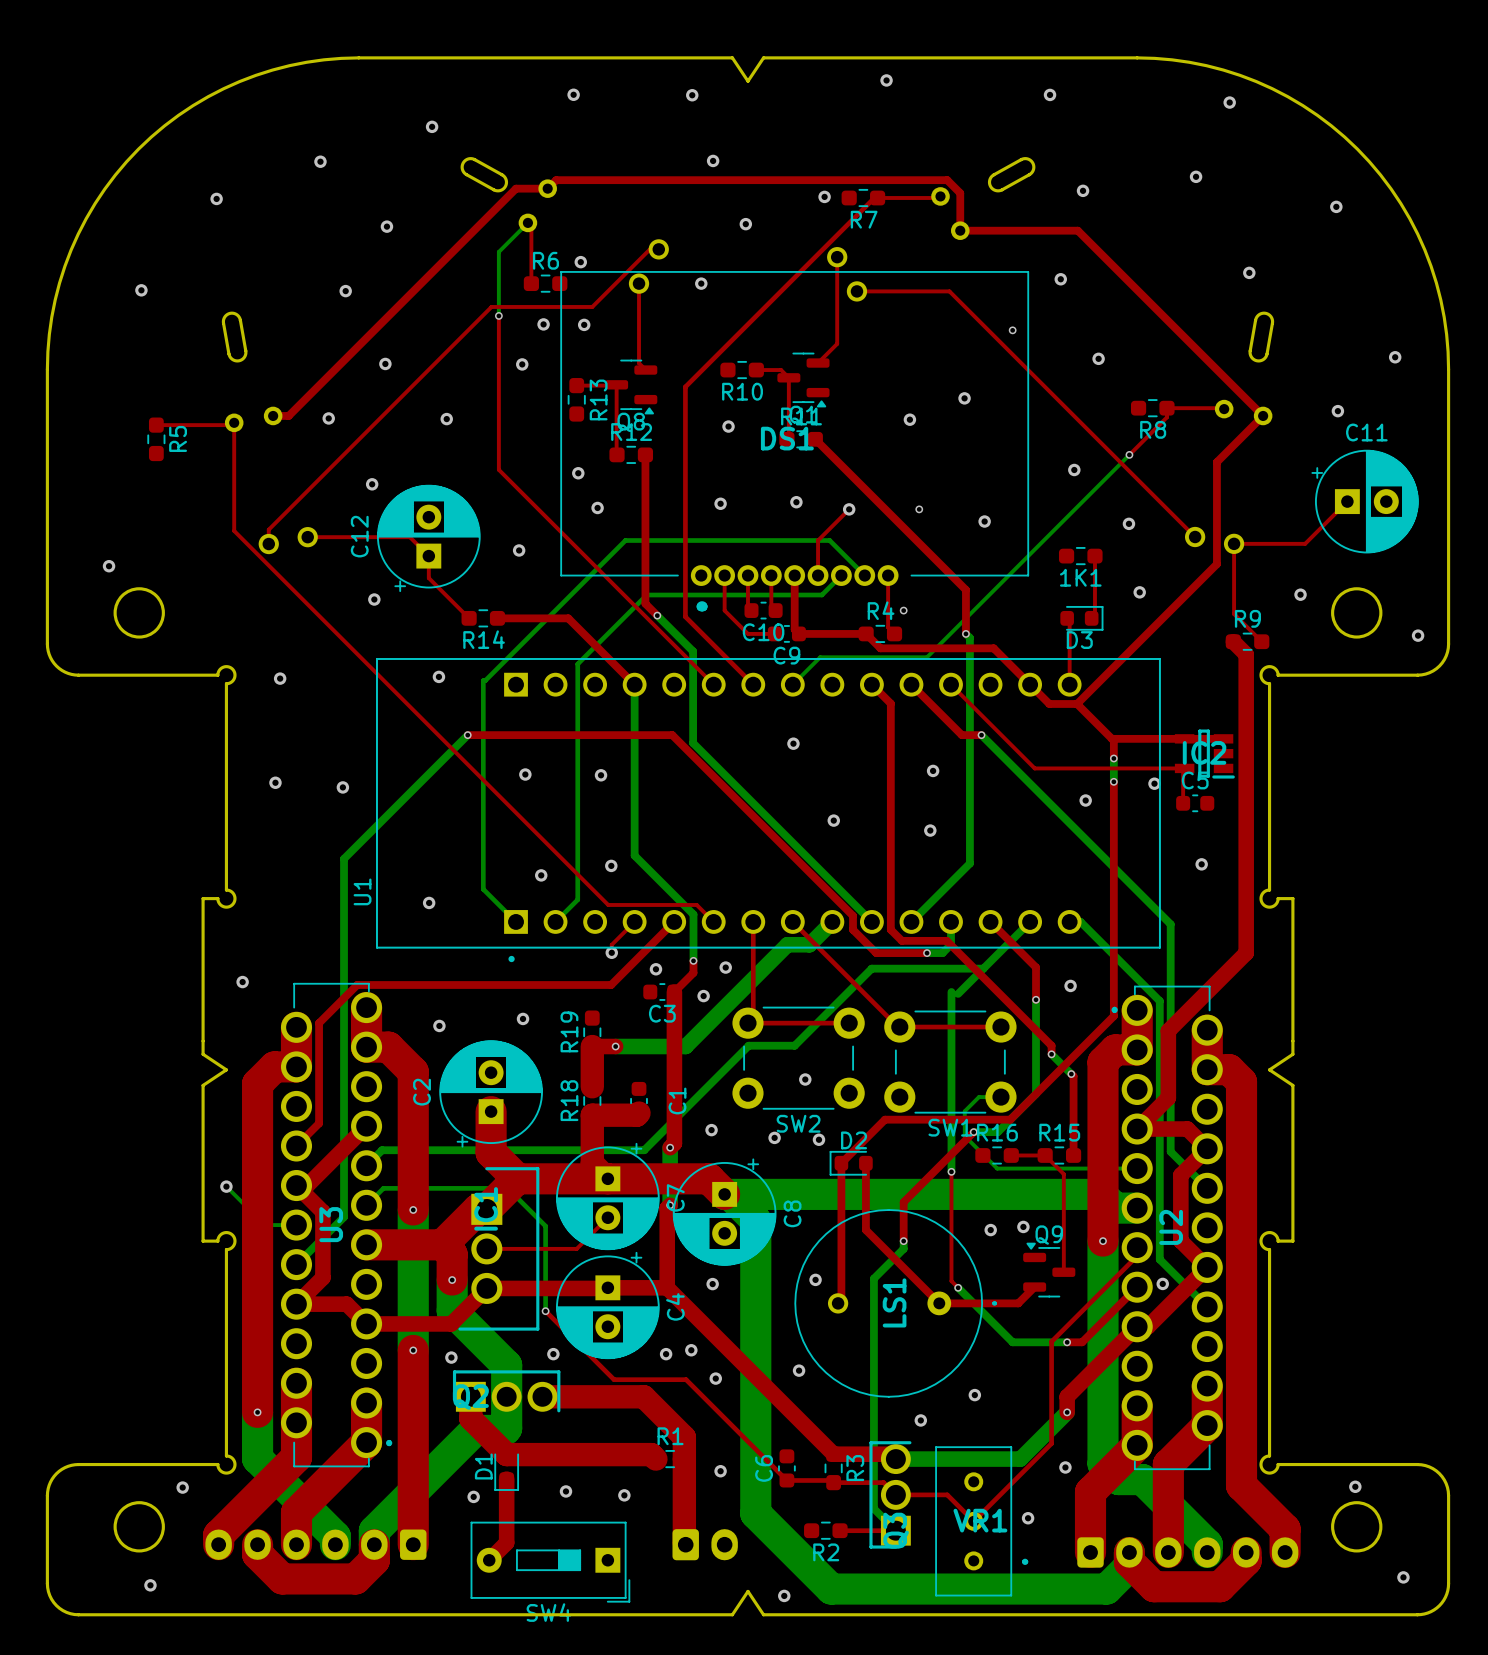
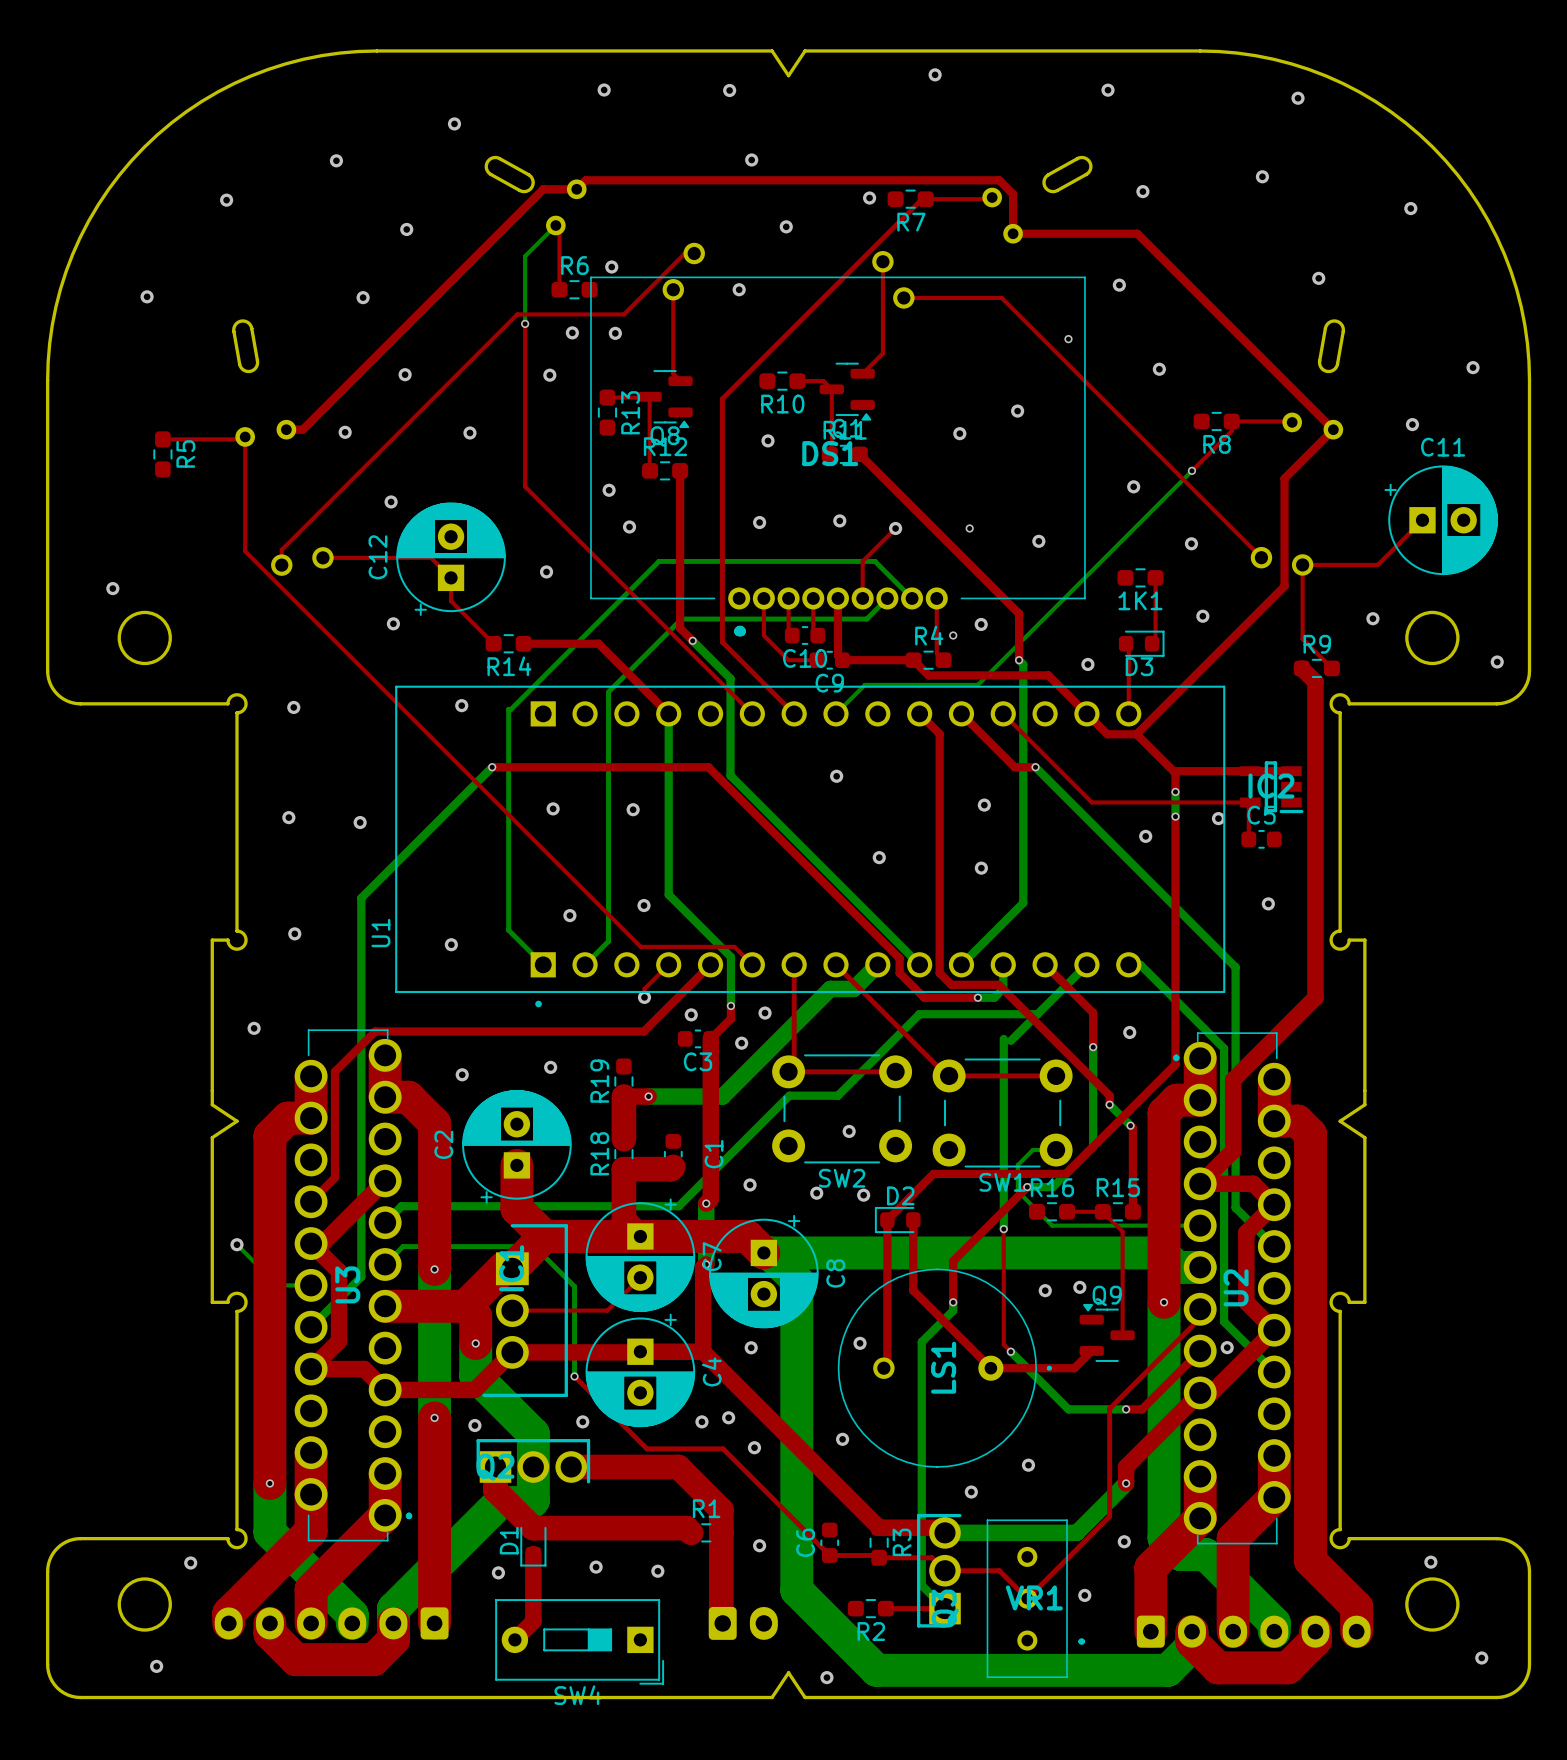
via: none -> (981, 624)
via: none -> (1087, 664)
via: none -> (294, 933)

